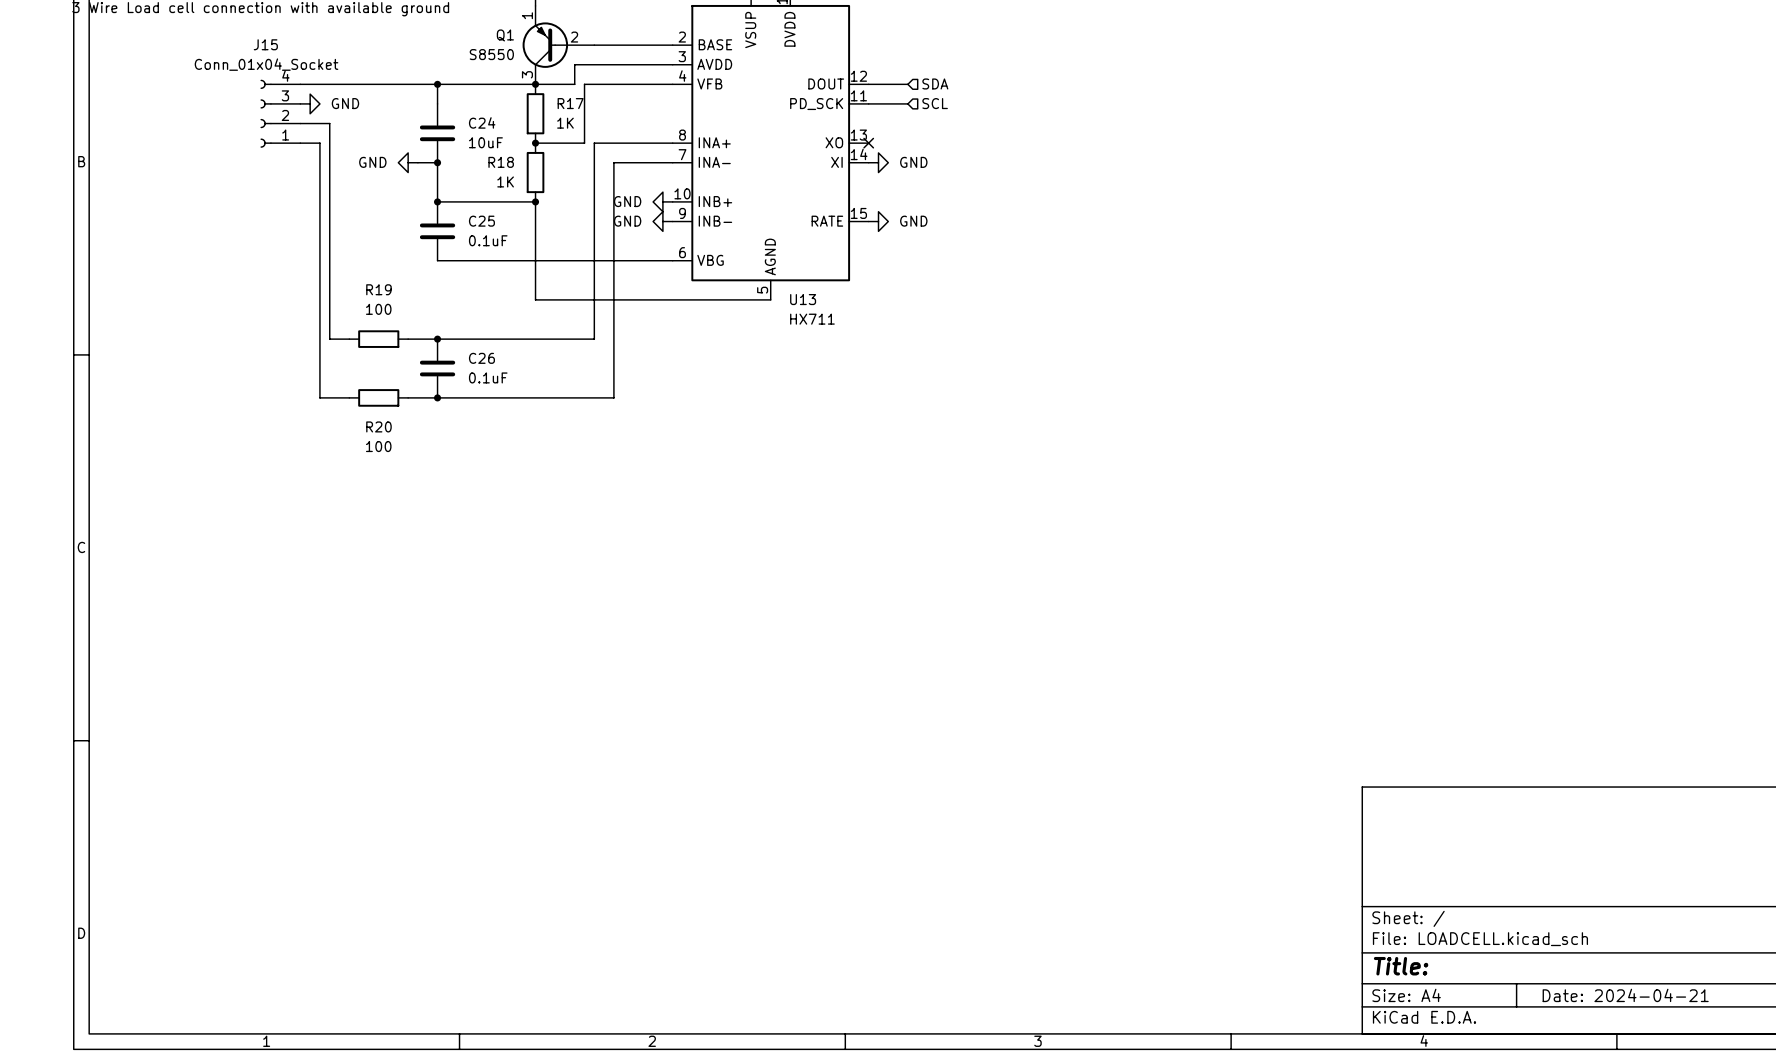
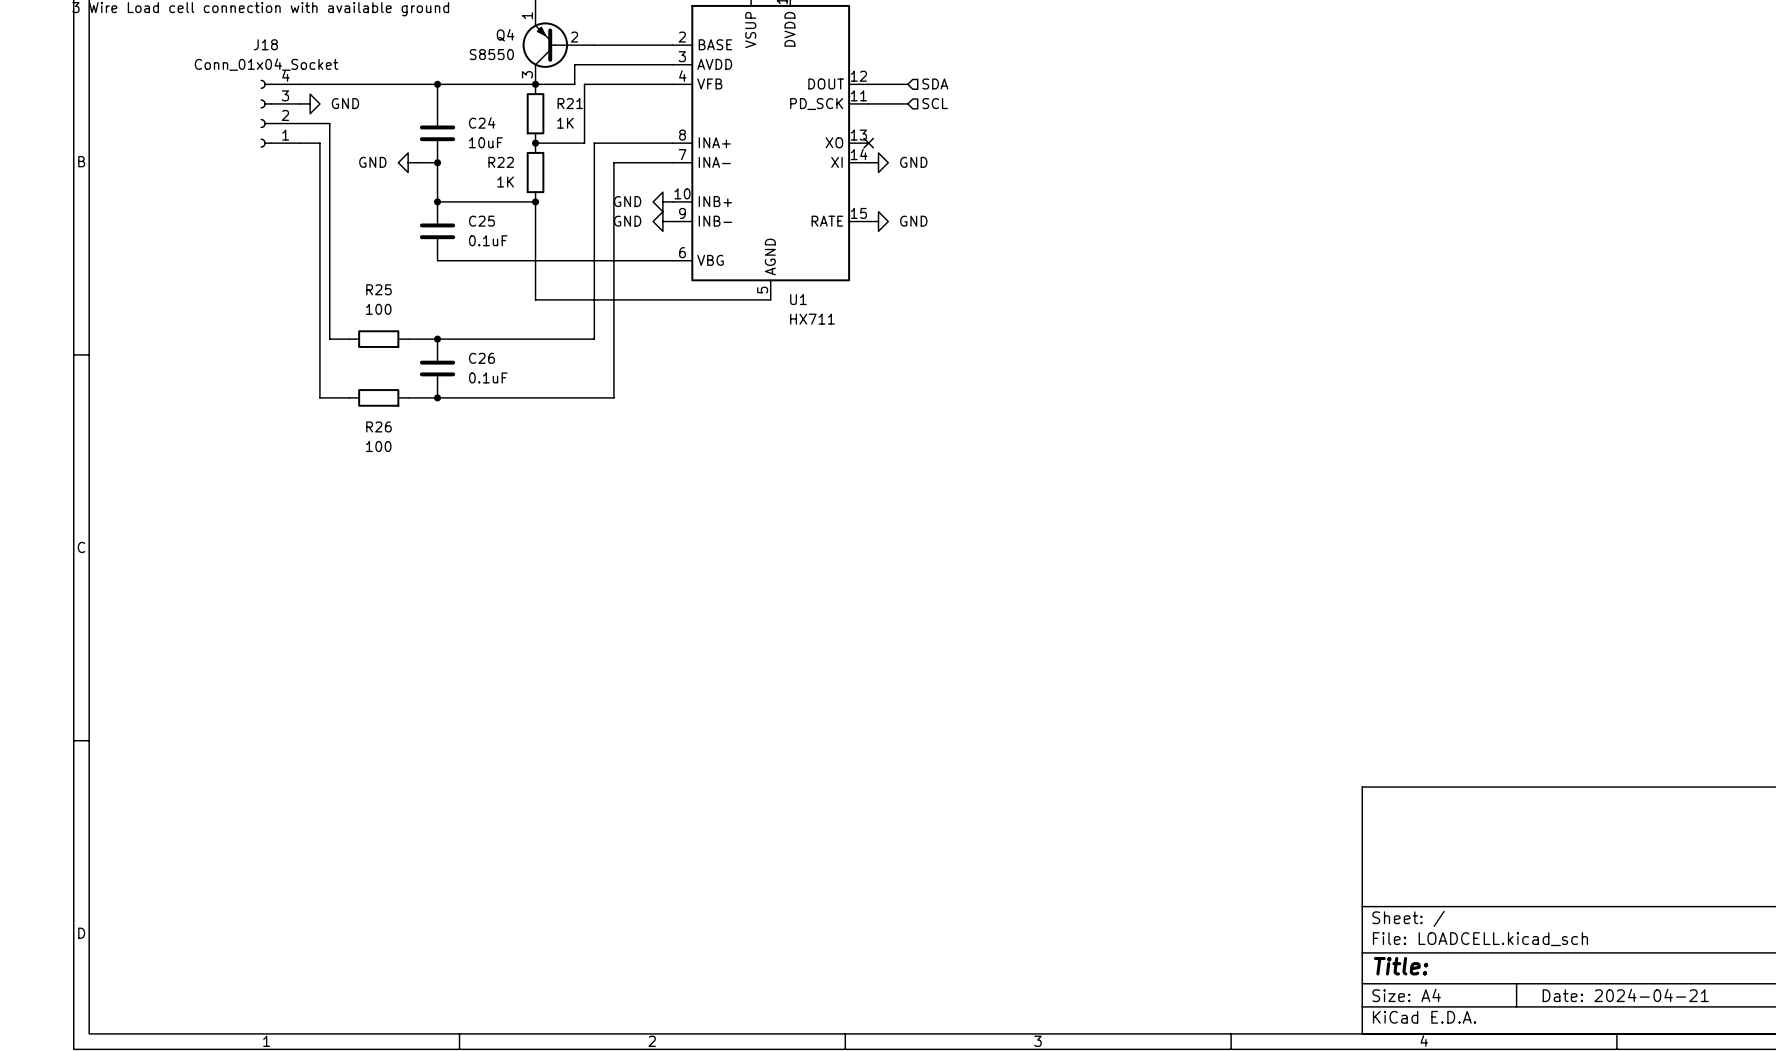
Q1 name: Q1 (505, 35) -> Q4 (505, 35)
J15 name: J15 (265, 44) -> J18 (265, 44)
R17 name: R17 (570, 103) -> R21 (570, 103)
R18 name: R18 (501, 162) -> R22 (501, 162)
R19 name: R19 (378, 289) -> R25 (378, 289)
U13 name: U13 (803, 299) -> U1 (798, 299)
R20 name: R20 (378, 426) -> R26 (378, 426)

